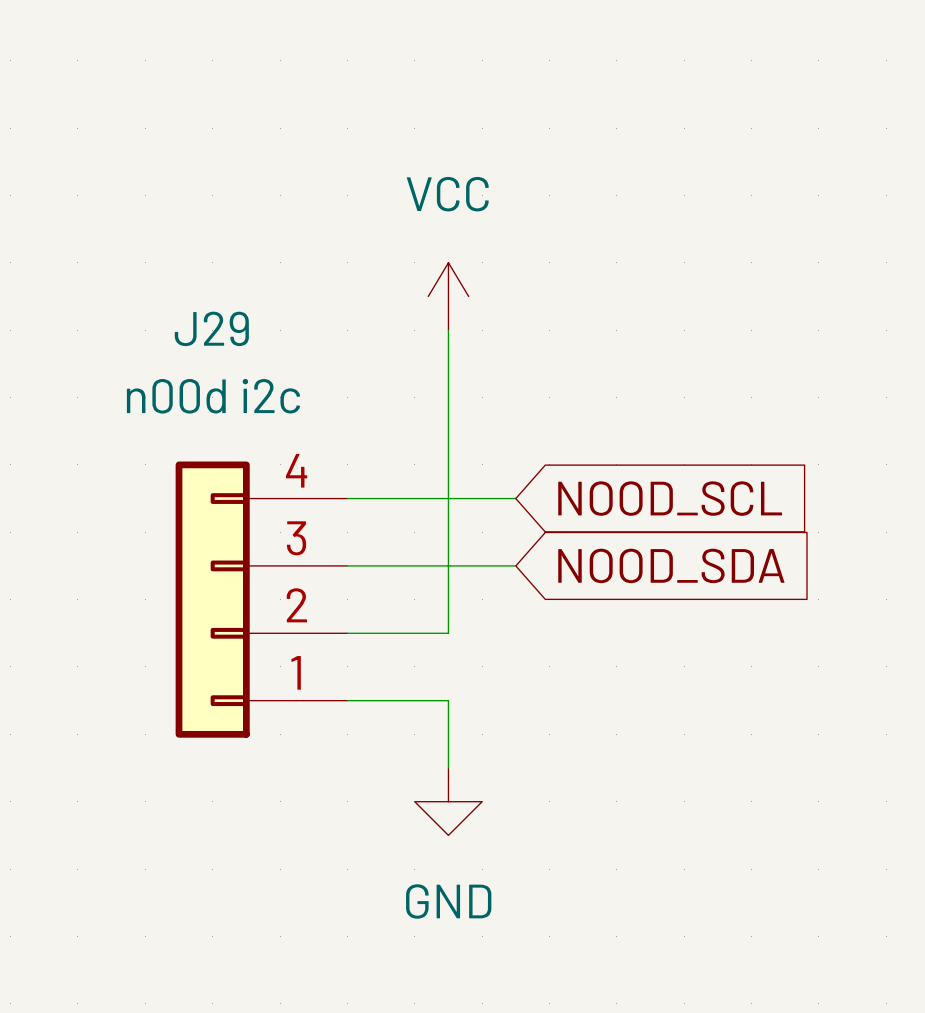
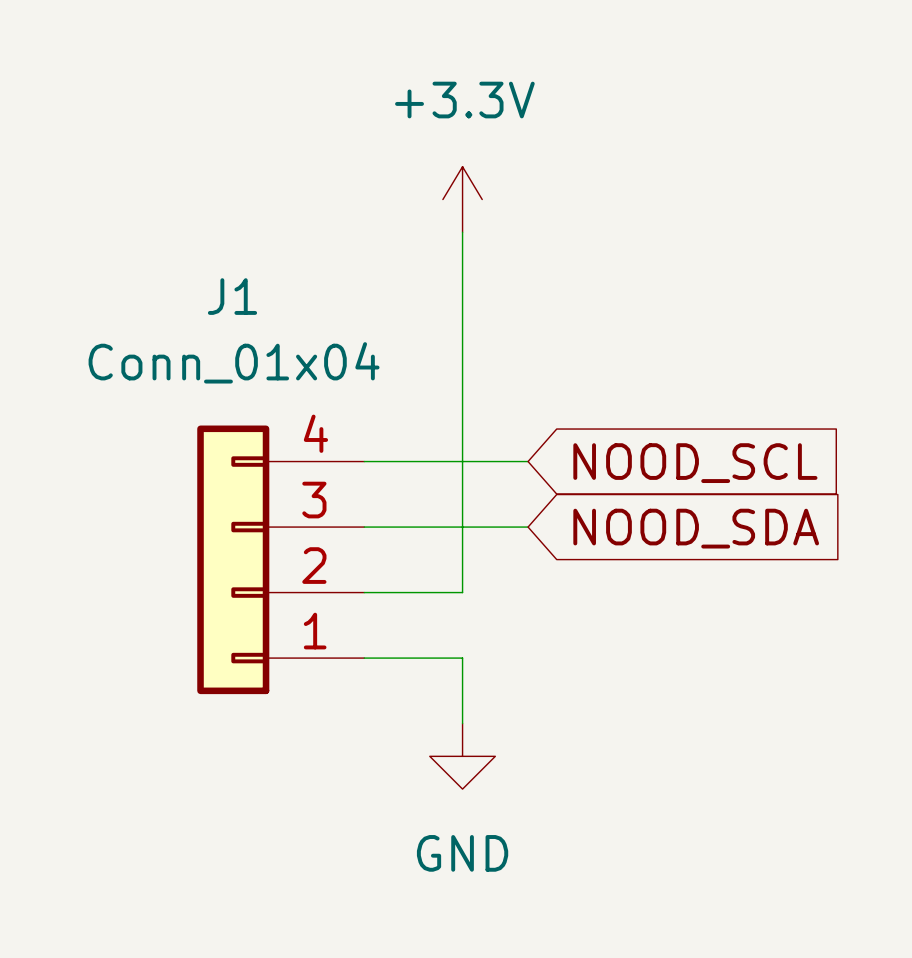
power symbol: none -> +3.3V (462, 199)
power symbol: VCC (448, 296) -> none
J29 name: J29 (211, 328) -> J1 (232, 296)
J29 value: n00d i2c (213, 396) -> Conn_01x04 (234, 362)

